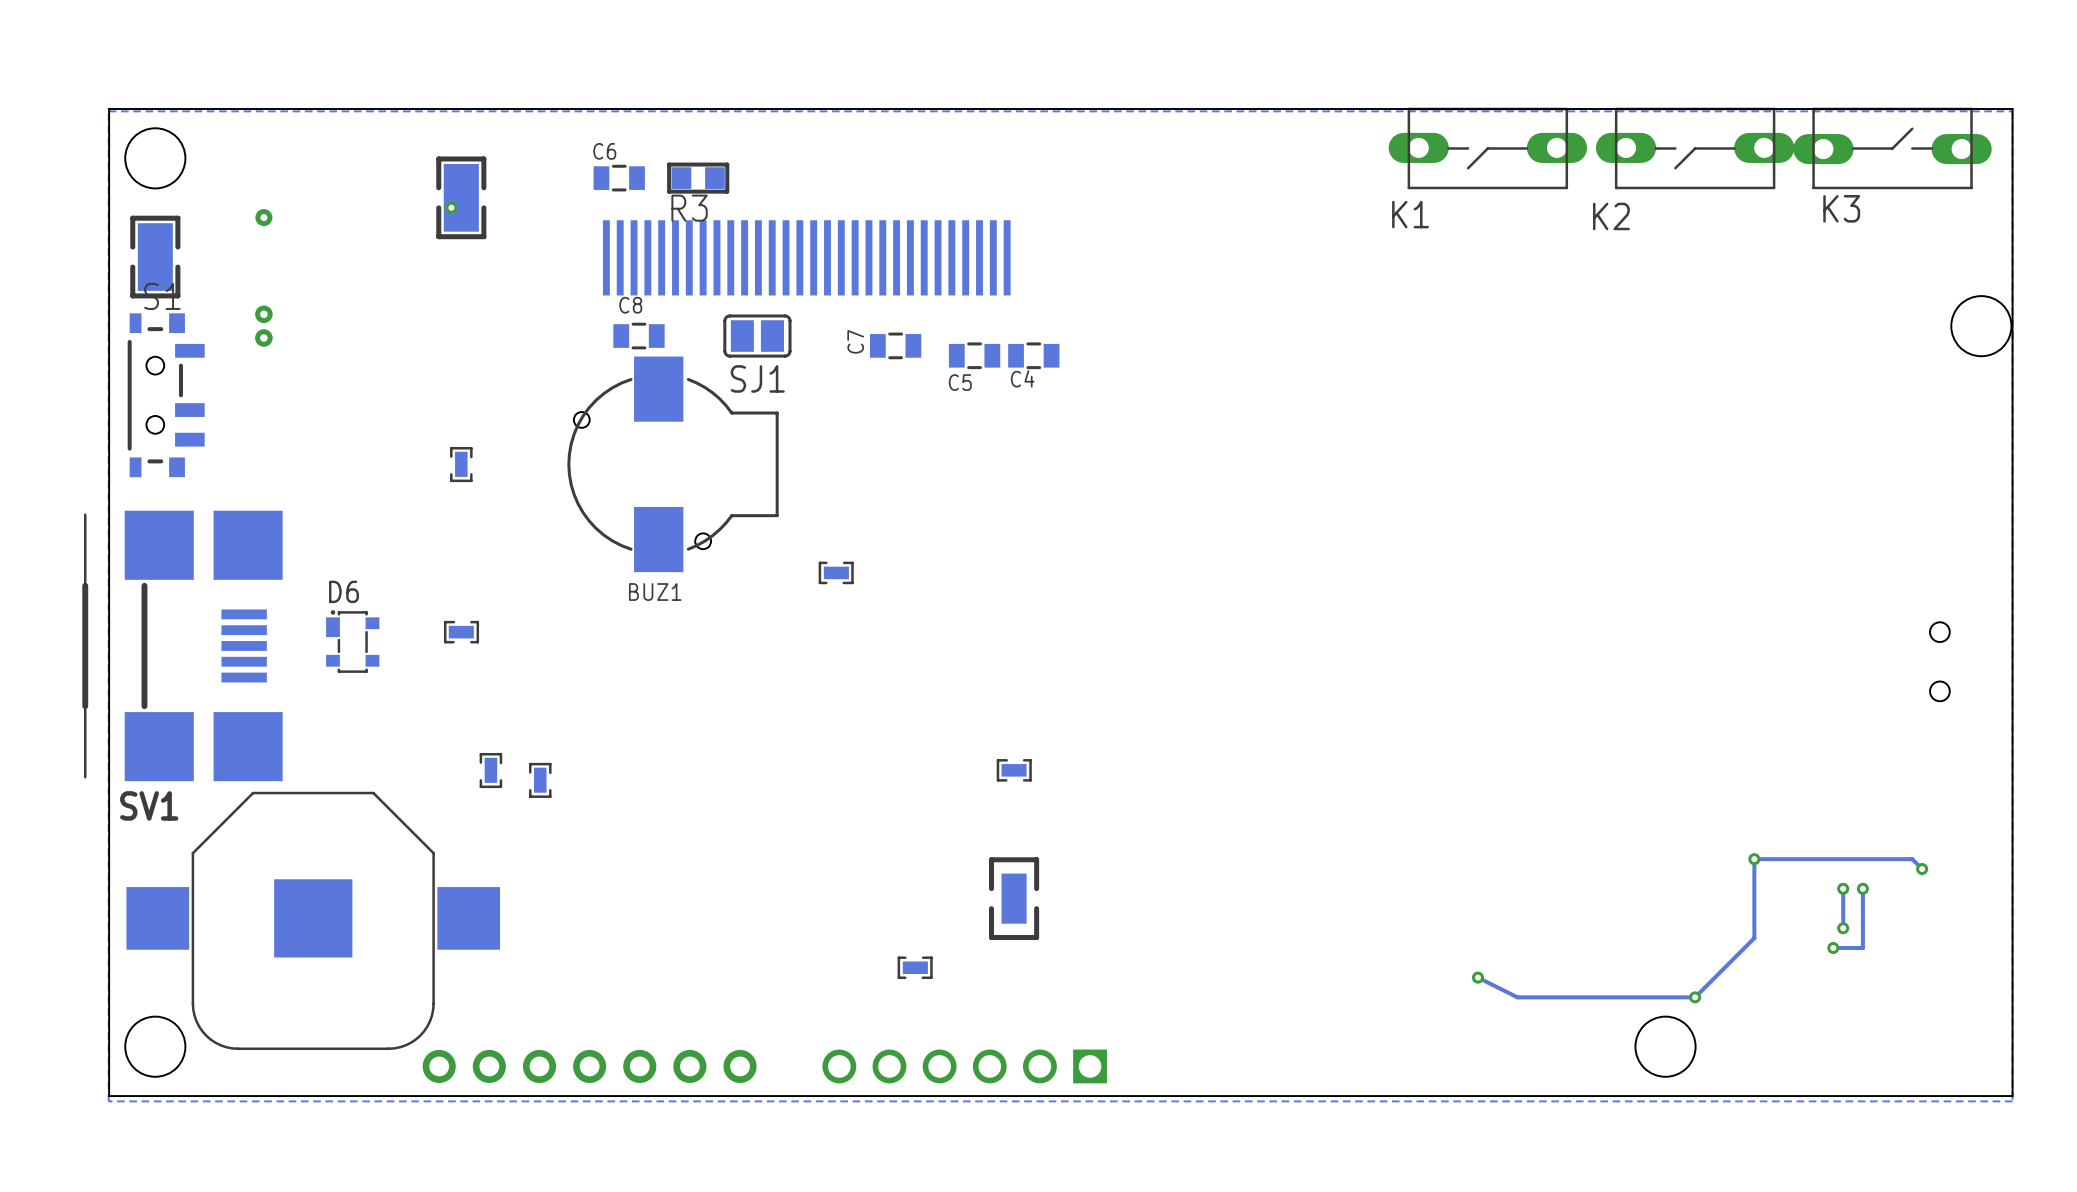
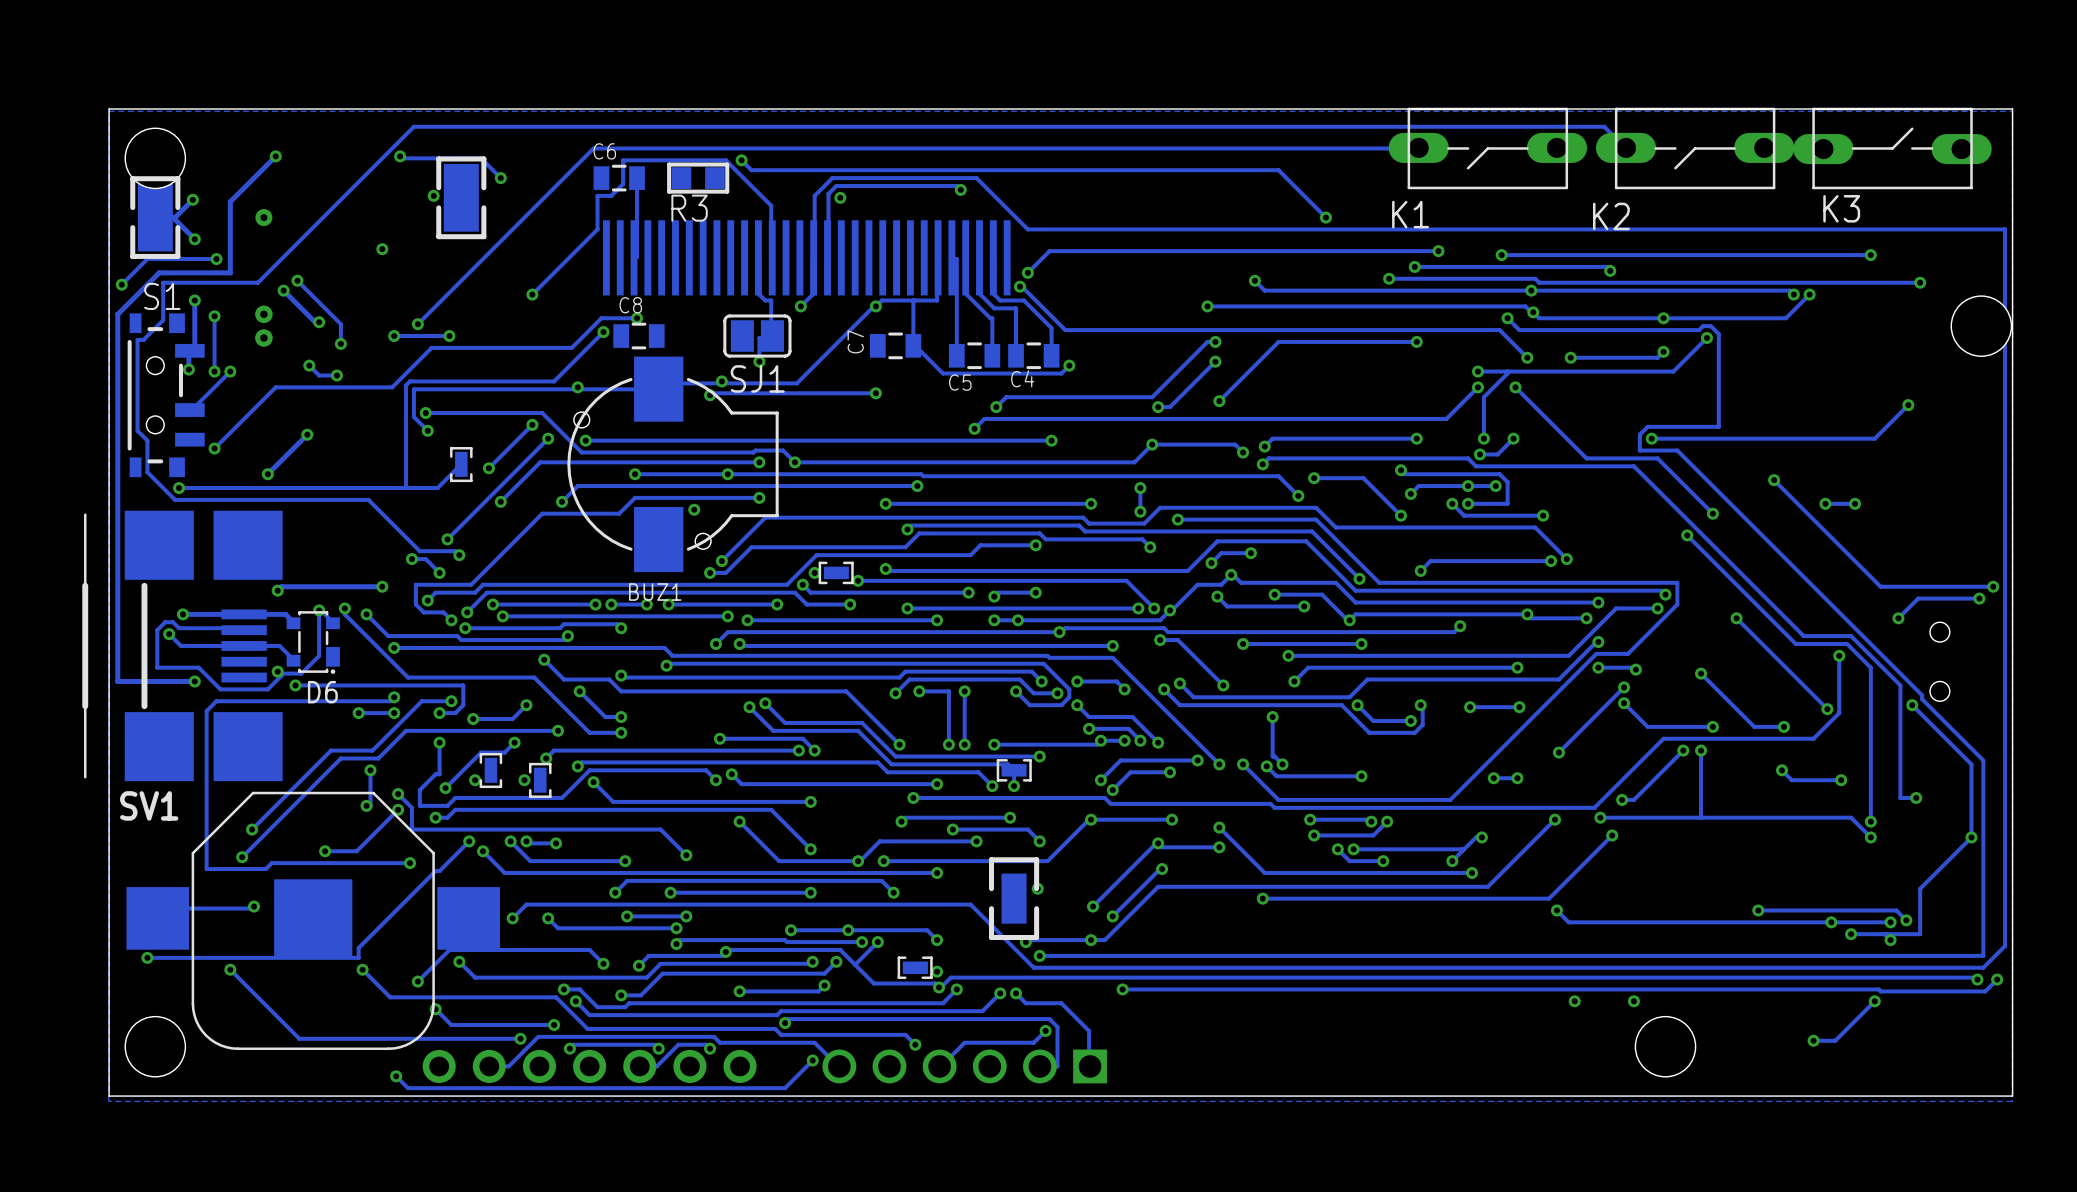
track: none -> (1418, 147) (593, 148) (417, 324)
track: none -> (1626, 147) (1604, 126) (413, 126) (257, 282) (163, 282) (163, 320) (143, 339) (137, 339) (137, 430) (147, 440) (147, 472) (175, 499) (368, 499) (419, 551) (455, 551) (459, 555)
track: none -> (275, 156) (230, 201) (230, 272) (159, 272) (117, 314) (117, 681) (194, 681)
via: none -> (275, 156)
track: none -> (400, 156) (402, 158) (481, 158) (500, 178)
via: none -> (400, 156)
track: none -> (741, 160) (751, 170) (1278, 170) (1325, 217)
via: none -> (741, 160)
via: none -> (500, 178)
track: none -> (637, 178) (637, 257) (634, 257)
track: none -> (960, 189) (956, 185) (836, 185) (828, 193) (827, 257)
via: none -> (960, 189)
via: none -> (840, 197)
track: none -> (192, 199) (175, 217)
via: none -> (192, 199)
via position: (451, 207) -> (433, 195)
track: none -> (175, 217) (194, 239)
via: none -> (1325, 217)
via: none -> (194, 239)
via: none -> (382, 249)
track: none -> (1438, 251) (1049, 251) (1027, 272)
via: none -> (1438, 251)
via: none -> (1501, 255)
track: none -> (1870, 255) (1501, 255)
via: none -> (1870, 255)
part position: (155, 257) -> (155, 217)
track: none -> (758, 257) (759, 294) (765, 300) (771, 300) (772, 336) (771, 338) (759, 338) (759, 361)
track: none -> (772, 257) (771, 205) (725, 160) (623, 160) (623, 184) (611, 195) (597, 195) (597, 229) (532, 294)
track: none -> (938, 257) (937, 300) (881, 300) (796, 383) (666, 383) (658, 389)
track: none -> (951, 257) (956, 259) (956, 355)
track: none -> (965, 257) (966, 294) (992, 318) (992, 355)
track: none -> (979, 257) (980, 294) (994, 308) (1016, 308) (1016, 355)
track: none -> (993, 257) (994, 294) (1000, 300) (1023, 300) (1051, 328) (1051, 355)
track: none -> (216, 259) (147, 259) (121, 284)
via: none -> (216, 259)
track: none -> (1414, 266) (1606, 266) (1610, 270)
via: none -> (1414, 266)
via: none -> (1610, 270)
via: none -> (1027, 272)
track: none -> (1389, 278) (1535, 278) (1539, 282) (1920, 282)
via: none -> (1389, 278)
track: none -> (297, 280) (340, 324) (340, 343)
via: none -> (297, 280)
track: none -> (1254, 280) (1264, 290) (1789, 290) (1793, 294)
via: none -> (1254, 280)
via: none -> (1920, 282)
via: none -> (121, 284)
track: none -> (1019, 286) (1065, 330) (1499, 330) (1527, 357)
via: none -> (1019, 286)
track: none -> (283, 290) (315, 322) (319, 322)
via: none -> (283, 290)
via: none -> (1531, 290)
via: none -> (532, 294)
via: none -> (1793, 294)
track: none -> (1809, 294) (1785, 318) (1539, 318) (1525, 306) (1207, 306)
via: none -> (1809, 294)
track: none -> (194, 300) (194, 349) (188, 351) (188, 369)
via: none -> (194, 300)
track: none -> (913, 300) (913, 345) (942, 373) (1061, 373) (1069, 365)
track: none -> (800, 306) (812, 294) (814, 195) (832, 178) (976, 178) (1027, 229) (2005, 229) (2005, 946) (1983, 967) (1033, 967) (970, 904) (526, 904) (512, 918)
via: none -> (800, 306)
via: none -> (875, 306)
via: none -> (1207, 306)
via: none -> (1533, 312)
track: none -> (214, 316) (214, 371)
via: none -> (214, 316)
track: none -> (637, 318) (601, 318) (571, 347) (431, 347) (392, 387) (275, 387) (214, 448)
via: none -> (637, 318)
track: none -> (1507, 318) (1519, 330) (1699, 330) (1703, 326) (1710, 326) (1718, 334) (1718, 426) (1647, 426) (1639, 434) (1639, 450) (1677, 450) (1922, 695) (1922, 699) (1983, 760) (1983, 955) (1039, 955)
via: none -> (1507, 318)
via: none -> (1663, 318)
via: none -> (319, 322)
via: none -> (417, 324)
track: none -> (603, 332) (554, 381) (409, 381) (406, 385) (406, 488)
via: none -> (603, 332)
via: none -> (394, 336)
track: none -> (449, 336) (394, 336)
via: none -> (449, 336)
track: none -> (1706, 338) (1673, 371) (1477, 371)
via: none -> (1706, 338)
track: none -> (1215, 341) (1207, 341) (1152, 397) (1006, 397) (996, 407)
via: none -> (1215, 341)
track: none -> (1416, 341) (1278, 341) (1219, 401)
via: none -> (1416, 341)
via: none -> (340, 343)
track: none -> (1663, 351) (1657, 357) (1570, 357)
via: none -> (1663, 351)
via: none -> (1527, 357)
via: none -> (1570, 357)
via: none -> (759, 361)
track: none -> (1215, 361) (1170, 407) (1158, 407)
via: none -> (1215, 361)
track: none -> (309, 365) (319, 375) (336, 375)
via: none -> (309, 365)
via: none -> (1069, 365)
via: none -> (188, 369)
via: none -> (214, 371)
track: none -> (230, 371) (189, 410)
via: none -> (230, 371)
via: none -> (1477, 371)
track: none -> (1507, 371) (1483, 397) (1483, 438)
via: none -> (336, 375)
via: none -> (721, 381)
via: none -> (577, 387)
track: none -> (1477, 387) (1446, 418) (984, 418) (974, 428)
via: none -> (1477, 387)
track: none -> (1515, 387) (1586, 458) (1657, 458) (1712, 513)
via: none -> (1515, 387)
track: none -> (658, 389) (413, 389) (413, 416) (427, 430)
track: none -> (875, 393) (712, 393) (710, 395)
via: none -> (875, 393)
via: none -> (710, 395)
via: none -> (1219, 401)
track: none -> (1908, 405) (1874, 438) (1651, 438)
via: none -> (1908, 405)
via: none -> (996, 407)
via: none -> (1158, 407)
track: none -> (425, 413) (542, 413) (581, 452) (753, 452) (755, 450) (783, 450) (794, 462) (1134, 462) (1152, 444) (1235, 444) (1243, 452)
via: none -> (425, 413)
track: none -> (532, 424) (488, 468)
via: none -> (532, 424)
via: none -> (974, 428)
via: none -> (427, 430)
track: none -> (307, 434) (267, 474)
via: none -> (307, 434)
track: none -> (548, 438) (447, 539)
via: none -> (548, 438)
track: none -> (1416, 438) (1272, 438) (1264, 446)
via: none -> (1416, 438)
via: none -> (1483, 438)
track: none -> (1513, 438) (1497, 454) (1479, 454)
via: none -> (1513, 438)
via: none -> (1651, 438)
via: none -> (585, 440)
track: none -> (1051, 440) (585, 440)
via: none -> (1051, 440)
via: none -> (1152, 444)
via: none -> (1264, 446)
via: none -> (214, 448)
via: none -> (1243, 452)
via: none -> (1479, 454)
track: none -> (759, 462) (540, 462) (500, 501)
via: none -> (759, 462)
via: none -> (794, 462)
track: none -> (461, 464) (437, 488) (179, 488)
track: none -> (1262, 464) (1268, 458) (1468, 458) (1475, 466) (1633, 466) (1803, 636) (1851, 636) (1900, 685) (1900, 797) (1916, 797)
via: none -> (1262, 464)
via: none -> (488, 468)
track: none -> (1400, 470) (1404, 474) (1499, 474) (1507, 482) (1507, 503) (1468, 503)
via: none -> (1400, 470)
via: none -> (267, 474)
track: none -> (635, 474) (1278, 476) (1298, 495)
via: none -> (635, 474)
via: none -> (727, 474)
track: none -> (1314, 478) (1363, 478) (1400, 515)
via: none -> (1314, 478)
track: none -> (1774, 480) (1880, 586) (1993, 586)
via: none -> (1774, 480)
track: none -> (917, 486) (577, 486) (561, 501)
via: none -> (917, 486)
via: none -> (1468, 486)
track: none -> (1495, 486) (1418, 486) (1410, 493)
via: none -> (1495, 486)
via: none -> (179, 488)
track: none -> (1140, 488) (1140, 511)
via: none -> (1140, 488)
via: none -> (1410, 493)
via: none -> (1298, 495)
track: none -> (759, 497) (635, 497) (619, 513) (542, 513) (471, 584) (415, 584) (415, 604) (423, 612) (443, 612) (451, 620)
via: none -> (759, 497)
via: none -> (500, 501)
via: none -> (561, 501)
via: none -> (885, 503)
track: none -> (1091, 503) (885, 503)
via: none -> (1091, 503)
track: none -> (1452, 503) (1464, 515) (1543, 515)
via: none -> (1452, 503)
via: none -> (1468, 503)
via: none -> (1825, 503)
track: none -> (1855, 503) (1825, 503)
via: none -> (1855, 503)
via: none -> (694, 509)
via: none -> (1140, 511)
via: none -> (1712, 513)
via: none -> (1400, 515)
via: none -> (1543, 515)
track: none -> (1177, 519) (1316, 519) (1379, 582) (1677, 582) (1677, 604) (1628, 653) (1596, 653) (1450, 799) (1278, 799) (1243, 764)
via: none -> (1177, 519)
track: none -> (907, 529) (911, 525) (1079, 525) (1085, 531) (1312, 531) (1359, 578)
via: none -> (907, 529)
track: none -> (1687, 535) (1795, 643) (1847, 643) (1870, 667) (1870, 821)
via: none -> (1687, 535)
via: none -> (447, 539)
track: none -> (1035, 545) (980, 545) (970, 555) (816, 555) (787, 584) (483, 584) (475, 592) (435, 592) (427, 600)
via: none -> (1035, 545)
track: none -> (1150, 547) (1142, 539) (1045, 539) (1039, 533) (919, 533) (905, 547) (751, 547) (725, 572) (710, 572)
via: none -> (1150, 547)
track: none -> (1250, 553) (1221, 553) (1211, 563)
via: none -> (1250, 553)
via: none -> (459, 555)
track: none -> (411, 559) (425, 559) (439, 572)
via: none -> (411, 559)
track: none -> (1566, 559) (1535, 527) (1335, 527) (1316, 507) (1160, 507) (1144, 523) (1089, 523) (1083, 517) (765, 517) (721, 561)
via: none -> (1566, 559)
via: none -> (721, 561)
track: none -> (1551, 561) (1430, 561) (1420, 570)
via: none -> (1551, 561)
via: none -> (1211, 563)
track: none -> (885, 568) (887, 570) (1187, 570) (1217, 541) (1306, 541) (1355, 590) (1661, 590) (1665, 594)
via: none -> (885, 568)
via: none -> (1420, 570)
via: none -> (439, 572)
via: none -> (710, 572)
via: none -> (814, 572)
via: none -> (1231, 574)
via: none -> (1359, 578)
track: none -> (858, 580) (1126, 580) (1154, 608)
via: none -> (858, 580)
track: none -> (802, 584) (810, 592) (968, 592)
via: none -> (802, 584)
track: none -> (382, 586) (281, 586) (277, 590)
via: none -> (382, 586)
via: none -> (1993, 586)
via: none -> (277, 590)
via: none -> (968, 592)
track: none -> (1035, 592) (998, 592) (994, 596)
via: none -> (1035, 592)
track: none -> (1274, 594) (1322, 594) (1347, 620) (1355, 614) (1527, 614) (1531, 618) (1586, 618)
via: none -> (1274, 594)
via: none -> (1665, 594)
via: none -> (994, 596)
track: none -> (1217, 596) (1227, 606) (1304, 606)
via: none -> (1217, 596)
track: none -> (1979, 598) (1918, 598) (1898, 618)
via: none -> (1979, 598)
via: none -> (427, 600)
track: none -> (1598, 602) (1355, 602) (1335, 582) (1241, 582) (1231, 574) (1221, 584) (1197, 584) (1160, 620) (994, 620)
via: none -> (1598, 602)
via: none -> (492, 604)
track: none -> (595, 604) (492, 604)
via: none -> (595, 604)
via: none -> (611, 604)
track: none -> (646, 604) (611, 604)
via: none -> (646, 604)
via: none -> (668, 604)
track: none -> (777, 604) (668, 604)
via: none -> (777, 604)
track: none -> (850, 604) (806, 604) (794, 592) (486, 592) (467, 612)
via: none -> (850, 604)
via: none -> (1304, 606)
track: none -> (344, 608) (344, 614) (408, 677) (534, 677) (589, 732) (621, 732)
via: none -> (344, 608)
via: none -> (907, 608)
track: none -> (1138, 608) (907, 608)
via: none -> (1138, 608)
via: none -> (1154, 608)
track: none -> (1657, 608) (1616, 608) (1568, 655) (1288, 655)
via: none -> (1657, 608)
via: none -> (319, 610)
via: none -> (1170, 610)
via: none -> (467, 612)
track: none -> (182, 614) (285, 614) (293, 623)
via: none -> (182, 614)
track: none -> (366, 614) (388, 636) (457, 636) (461, 640) (563, 640) (567, 636)
via: none -> (366, 614)
via: none -> (1527, 614)
via: none -> (502, 616)
track: none -> (727, 616) (502, 616)
via: none -> (727, 616)
via: none -> (1586, 618)
track: none -> (1736, 618) (1827, 709)
via: none -> (1736, 618)
via: none -> (1898, 618)
via: none -> (451, 620)
via: none -> (747, 620)
track: none -> (937, 620) (747, 620)
via: none -> (937, 620)
via: none -> (994, 620)
via: none -> (1018, 620)
via: none -> (1349, 620)
track: none -> (332, 623) (319, 610) (319, 655) (301, 673) (279, 673)
track: none -> (1460, 626) (1454, 632) (1168, 632) (1164, 628) (1065, 628) (1061, 632) (727, 632) (715, 643)
via: none -> (1460, 626)
via: none -> (465, 628)
track: none -> (621, 628) (617, 624) (563, 624) (560, 628) (465, 628)
via: none -> (621, 628)
track: none -> (244, 630) (242, 628) (179, 628) (173, 622) (165, 622) (157, 630) (157, 667) (198, 667) (220, 689) (267, 689) (281, 675) (277, 671)
part: (461, 632) -> none
via: none -> (1059, 632)
track: none -> (169, 634) (180, 645) (279, 645) (293, 660)
via: none -> (169, 634)
via: none -> (567, 636)
track: none -> (1160, 640) (1177, 640) (1223, 685)
via: none -> (1160, 640)
D6 rotation: 0° (352, 641) -> 180° (313, 642)
D6 position: (352, 641) -> (313, 642)
track: none -> (1598, 642) (1558, 679) (1367, 679) (1349, 697) (1193, 697) (1179, 683)
via: none -> (1598, 642)
via: none -> (715, 643)
track: none -> (739, 643) (741, 645) (1112, 645)
via: none -> (739, 643)
via: none -> (1243, 643)
track: none -> (1361, 643) (1243, 643)
via: none -> (1361, 643)
via: none -> (1112, 645)
track: none -> (394, 647) (664, 647) (672, 655) (1047, 655) (1049, 657) (1112, 657) (1219, 764)
via: none -> (394, 647)
via: none -> (1288, 655)
track: none -> (1839, 655) (1839, 713) (1813, 738) (1663, 738) (1594, 807) (1274, 807) (1270, 803) (1110, 803) (1104, 797) (913, 797)
via: none -> (1839, 655)
track: none -> (544, 659) (563, 679) (609, 679) (621, 691) (846, 691) (899, 744)
via: none -> (544, 659)
track: none -> (666, 665) (668, 663) (1043, 663) (1069, 689) (1069, 697) (1061, 705) (1029, 705) (1016, 691)
via: none -> (666, 665)
track: none -> (1517, 667) (1308, 667) (1294, 681)
via: none -> (1517, 667)
track: none -> (1598, 667) (1633, 667) (1635, 669)
via: none -> (1598, 667)
via: none -> (1635, 669)
via: none -> (277, 671)
track: none -> (1701, 673) (1754, 726) (1783, 726)
via: none -> (1701, 673)
track: none -> (621, 675) (623, 677) (899, 677) (905, 671) (1031, 671) (1041, 681)
via: none -> (621, 675)
via: none -> (194, 681)
via: none -> (1041, 681)
track: none -> (1077, 681) (1116, 681) (1124, 689)
via: none -> (1077, 681)
via: none -> (1294, 681)
via: none -> (1179, 683)
track: none -> (295, 685) (463, 685) (463, 705) (455, 713) (439, 713)
via: none -> (295, 685)
via: none -> (1223, 685)
track: none -> (1624, 687) (1558, 752)
via: none -> (1624, 687)
via: none -> (1124, 689)
track: none -> (1164, 689) (1179, 705) (1341, 705) (1369, 732) (1414, 732) (1422, 724) (1422, 705) (1420, 705)
via: none -> (1164, 689)
track: none -> (579, 691) (605, 717) (621, 717)
via: none -> (579, 691)
track: none -> (919, 691) (948, 691) (948, 744)
via: none -> (919, 691)
track: none -> (964, 691) (964, 744)
via: none -> (964, 691)
via: none -> (1016, 691)
via: none -> (895, 693)
track: none -> (1057, 693) (1033, 693) (1019, 679) (909, 679) (895, 693)
via: none -> (1057, 693)
track: none -> (394, 697) (390, 701) (216, 701) (206, 711) (206, 869) (265, 869) (271, 863) (409, 863)
via: none -> (394, 697)
track: none -> (451, 701) (421, 701) (372, 750) (331, 750) (252, 829)
via: none -> (451, 701)
track: none -> (765, 703) (785, 722) (862, 722) (895, 756) (1039, 756)
via: none -> (765, 703)
track: none -> (1624, 703) (1647, 726) (1712, 726)
via: none -> (1624, 703)
track: none -> (526, 705) (512, 719) (473, 719)
via: none -> (526, 705)
track: none -> (1077, 705) (1089, 717) (1132, 717) (1158, 742)
via: none -> (1077, 705)
track: none -> (1357, 705) (1373, 720) (1410, 720)
via: none -> (1357, 705)
via: none -> (1420, 705)
track: none -> (1912, 705) (1971, 764) (1971, 837) (1920, 888) (1920, 934) (1885, 935)
via: none -> (1912, 705)
track: none -> (749, 707) (773, 730) (858, 730) (891, 764) (1008, 764) (1014, 770) (1014, 786)
via: none -> (749, 707)
via: none -> (1470, 707)
track: none -> (1519, 707) (1470, 707)
via: none -> (1519, 707)
via: none -> (1827, 709)
via: none -> (358, 713)
track: none -> (394, 713) (358, 713)
via: none -> (394, 713)
via: none -> (439, 713)
via: none -> (621, 717)
track: none -> (1272, 717) (1272, 756) (1282, 764)
via: none -> (1272, 717)
via: none -> (473, 719)
via: none -> (1410, 720)
via: none -> (1712, 726)
via: none -> (1783, 726)
track: none -> (1089, 728) (1128, 728) (1140, 740)
via: none -> (1089, 728)
track: none -> (558, 730) (406, 730) (378, 758) (340, 758) (242, 857)
via: none -> (558, 730)
via: none -> (621, 732)
track: none -> (719, 738) (802, 738) (814, 750)
via: none -> (719, 738)
via: none -> (1100, 740)
track: none -> (1124, 740) (1100, 740) (1096, 744) (994, 744)
via: none -> (1124, 740)
via: none -> (1140, 740)
track: none -> (439, 742) (439, 774) (435, 774) (419, 790) (419, 805) (447, 805) (455, 797) (561, 797) (589, 770) (706, 770) (715, 780)
via: none -> (439, 742)
track: none -> (514, 742) (504, 752) (481, 752) (445, 788)
via: none -> (514, 742)
via: none -> (1158, 742)
via: none -> (899, 744)
via: none -> (948, 744)
via: none -> (964, 744)
via: none -> (994, 744)
track: none -> (798, 750) (554, 750) (546, 758)
via: none -> (798, 750)
via: none -> (814, 750)
track: none -> (1683, 750) (1633, 799) (1622, 799)
via: none -> (1683, 750)
track: none -> (1701, 750) (1701, 817)
via: none -> (1701, 750)
via: none -> (1558, 752)
via: none -> (1039, 756)
via: none -> (546, 758)
track: none -> (1197, 760) (1120, 760) (1100, 780)
via: none -> (1197, 760)
via: none -> (1219, 764)
via: none -> (1243, 764)
via: none -> (1282, 764)
track: none -> (577, 766) (581, 762) (877, 762) (887, 772) (978, 772) (992, 786)
via: none -> (577, 766)
track: none -> (1266, 766) (1276, 776) (1361, 776)
via: none -> (1266, 766)
track: none -> (370, 770) (370, 805) (366, 805)
via: none -> (370, 770)
track: none -> (1781, 770) (1791, 780) (1841, 780)
via: none -> (1781, 770)
track: none -> (1170, 772) (1130, 772) (1112, 790)
via: none -> (1170, 772)
track: none -> (731, 774) (741, 784) (937, 784)
via: none -> (731, 774)
via: none -> (1361, 776)
via: none -> (1493, 778)
track: none -> (1517, 778) (1493, 778)
via: none -> (1517, 778)
via: none -> (475, 780)
via: none -> (524, 780)
via: none -> (715, 780)
via: none -> (1100, 780)
via: none -> (1841, 780)
track: none -> (593, 782) (613, 801) (810, 801)
via: none -> (593, 782)
via: none -> (937, 784)
via: none -> (992, 786)
via: none -> (1014, 786)
via: none -> (445, 788)
via: none -> (1112, 790)
track: none -> (398, 794) (411, 807) (411, 829) (660, 829) (686, 855)
via: none -> (398, 794)
via: none -> (913, 797)
via: none -> (1916, 797)
via: none -> (1622, 799)
via: none -> (810, 801)
via: none -> (366, 805)
track: none -> (398, 809) (356, 851) (325, 851)
via: none -> (398, 809)
track: none -> (435, 817) (447, 817) (455, 809) (771, 809) (810, 849)
via: none -> (435, 817)
track: none -> (1010, 817) (905, 817) (901, 821)
via: none -> (1010, 817)
track: none -> (1600, 817) (1851, 817) (1870, 837)
via: none -> (1600, 817)
via: none -> (1091, 819)
track: none -> (1171, 819) (1089, 819) (1047, 861) (883, 861)
via: none -> (1171, 819)
track: none -> (1310, 819) (1369, 819) (1371, 821)
via: none -> (1310, 819)
track: none -> (1554, 819) (1487, 886) (1158, 886) (1104, 940) (1027, 940) (1025, 942)
via: none -> (1554, 819)
track: none -> (739, 821) (779, 861) (860, 861) (879, 841) (976, 841)
via: none -> (739, 821)
via: none -> (901, 821)
via: none -> (1371, 821)
track: none -> (1387, 821) (1373, 835) (1314, 835)
via: none -> (1387, 821)
via: none -> (1870, 821)
track: none -> (1219, 827) (1264, 872) (1472, 872)
via: none -> (1219, 827)
via: none -> (252, 829)
track: none -> (952, 829) (1027, 829) (1039, 841)
via: none -> (952, 829)
via: none -> (1314, 835)
track: none -> (1612, 835) (1549, 898) (1262, 898)
via: none -> (1612, 835)
track: none -> (1481, 837) (1475, 837) (1452, 861)
via: none -> (1481, 837)
via: none -> (1870, 837)
via: none -> (1971, 837)
track: none -> (469, 841) (439, 871) (435, 871) (358, 948) (358, 957) (147, 957)
via: none -> (469, 841)
track: none -> (510, 841) (530, 861) (625, 861)
via: none -> (510, 841)
track: none -> (526, 841) (528, 843) (556, 843)
via: none -> (526, 841)
via: none -> (976, 841)
via: none -> (1039, 841)
via: none -> (556, 843)
via: none -> (1158, 843)
track: none -> (1219, 847) (1162, 847) (1156, 843) (1093, 906)
via: none -> (1219, 847)
via: none -> (810, 849)
track: none -> (1337, 849) (1349, 861) (1383, 861)
via: none -> (1337, 849)
track: none -> (1353, 849) (1463, 850)
via: none -> (1353, 849)
via: none -> (325, 851)
track: none -> (483, 851) (504, 872) (937, 872)
via: none -> (483, 851)
via: none -> (686, 855)
via: none -> (242, 857)
via: (1754, 859) -> none
via: none -> (625, 861)
via: none -> (858, 861)
via: none -> (883, 861)
via: none -> (1383, 861)
via: none -> (1452, 861)
via: none -> (409, 863)
track: none -> (1162, 869) (1112, 916)
via: none -> (1162, 869)
track: (1922, 869) (1912, 859) (1754, 859) (1754, 938) (1695, 997) (1517, 997) (1477, 977) -> none
via: (1922, 869) -> none
via: none -> (937, 872)
via: none -> (1472, 872)
via: none -> (1037, 888)
track: (1843, 888) (1843, 928) -> none
via: (1843, 888) -> none
track: (1862, 888) (1862, 948) (1833, 948) -> none
via: (1862, 888) -> none
via: none -> (615, 892)
via: none -> (670, 892)
track: none -> (810, 892) (670, 892)
via: none -> (810, 892)
track: none -> (893, 892) (881, 880) (627, 880) (615, 892)
via: none -> (893, 892)
via: none -> (1262, 898)
track: none -> (254, 906) (252, 908) (157, 908)
via: none -> (254, 906)
via: none -> (1093, 906)
track: none -> (1556, 910) (1568, 922) (1890, 922)
via: none -> (1556, 910)
track: none -> (1758, 910) (1896, 910) (1906, 920)
via: none -> (1758, 910)
via: none -> (627, 916)
track: none -> (686, 916) (627, 916)
via: none -> (686, 916)
via: none -> (1112, 916)
via: none -> (512, 918)
track: none -> (548, 918) (558, 928) (676, 928)
via: none -> (548, 918)
via: none -> (1906, 920)
via: none -> (1831, 922)
via: none -> (1890, 922)
via: none -> (676, 928)
via: (1843, 928) -> none
track: none -> (790, 930) (927, 930) (937, 940)
via: none -> (790, 930)
via: none -> (848, 930)
track: none -> (1851, 934) (1884, 934) (1890, 940)
via: none -> (1851, 934)
via: none -> (937, 940)
via: none -> (1091, 940)
via: none -> (1890, 940)
track: none -> (862, 942) (680, 940) (676, 944)
via: none -> (862, 942)
track: none -> (877, 942) (855, 964)
via: none -> (877, 942)
via: none -> (1025, 942)
via: none -> (676, 944)
via: (1833, 948) -> none
via: none -> (725, 951)
via: none -> (1039, 955)
via: none -> (147, 957)
via: none -> (459, 961)
track: none -> (812, 961) (810, 963) (660, 963) (646, 977) (475, 977) (459, 961)
via: none -> (812, 961)
track: none -> (836, 961) (824, 973) (662, 973) (640, 995) (621, 995)
via: none -> (836, 961)
track: none -> (603, 963) (589, 949) (449, 949) (417, 981)
via: none -> (603, 963)
track: none -> (638, 965) (648, 955) (721, 955) (725, 949) (840, 949) (873, 983) (935, 983) (939, 987) (950, 977) (1975, 977) (1977, 979)
via: none -> (638, 965)
track: none -> (230, 969) (299, 1038) (520, 1038)
via: none -> (230, 969)
track: none -> (362, 969) (390, 997) (556, 997) (587, 1028) (775, 1028) (781, 1034) (905, 1034) (915, 1044)
via: none -> (362, 969)
via: none -> (937, 971)
via: (1477, 977) -> none
via: none -> (1977, 979)
track: none -> (1997, 979) (1985, 991) (1880, 991) (1878, 989) (1122, 989)
via: none -> (1997, 979)
via: none -> (417, 981)
track: none -> (824, 985) (818, 991) (739, 991)
via: none -> (824, 985)
via: none -> (939, 987)
via: none -> (563, 989)
track: none -> (956, 989) (942, 1003) (629, 1003) (625, 1007) (597, 1007) (579, 989) (563, 989)
via: none -> (956, 989)
via: none -> (1122, 989)
via: none -> (739, 991)
track: none -> (1000, 993) (982, 1011) (781, 1011) (777, 1015) (589, 1015) (575, 1001)
via: none -> (1000, 993)
track: none -> (1016, 993) (1025, 1003) (1061, 1003) (1089, 1030) (1090, 1066)
via: none -> (1016, 993)
via: none -> (621, 995)
via: (1695, 997) -> none
via: none -> (575, 1001)
via: none -> (1574, 1001)
via: none -> (1633, 1001)
track: none -> (1874, 1001) (1835, 1040) (1813, 1040)
via: none -> (1874, 1001)
track: none -> (435, 1009) (451, 1024) (554, 1024)
via: none -> (435, 1009)
track: none -> (785, 1023) (789, 1019) (1049, 1019) (1057, 1026) (1057, 1066) (1039, 1066)
via: none -> (785, 1023)
via: none -> (554, 1024)
track: none -> (1045, 1030) (1033, 1042) (964, 1042) (939, 1066)
via: none -> (1045, 1030)
via: none -> (520, 1038)
via: none -> (1813, 1040)
via: none -> (915, 1044)
via: none -> (569, 1048)
track: none -> (658, 1048) (654, 1044) (573, 1044) (569, 1048)
via: none -> (658, 1048)
track: none -> (710, 1048) (706, 1044) (678, 1044) (656, 1066) (639, 1066)
via: none -> (710, 1048)
track: none -> (812, 1060) (785, 1088) (408, 1088) (396, 1076)
via: none -> (812, 1060)
track: none -> (839, 1066) (814, 1042) (719, 1042) (713, 1036) (538, 1036) (508, 1066) (489, 1066)
via: none -> (396, 1076)

